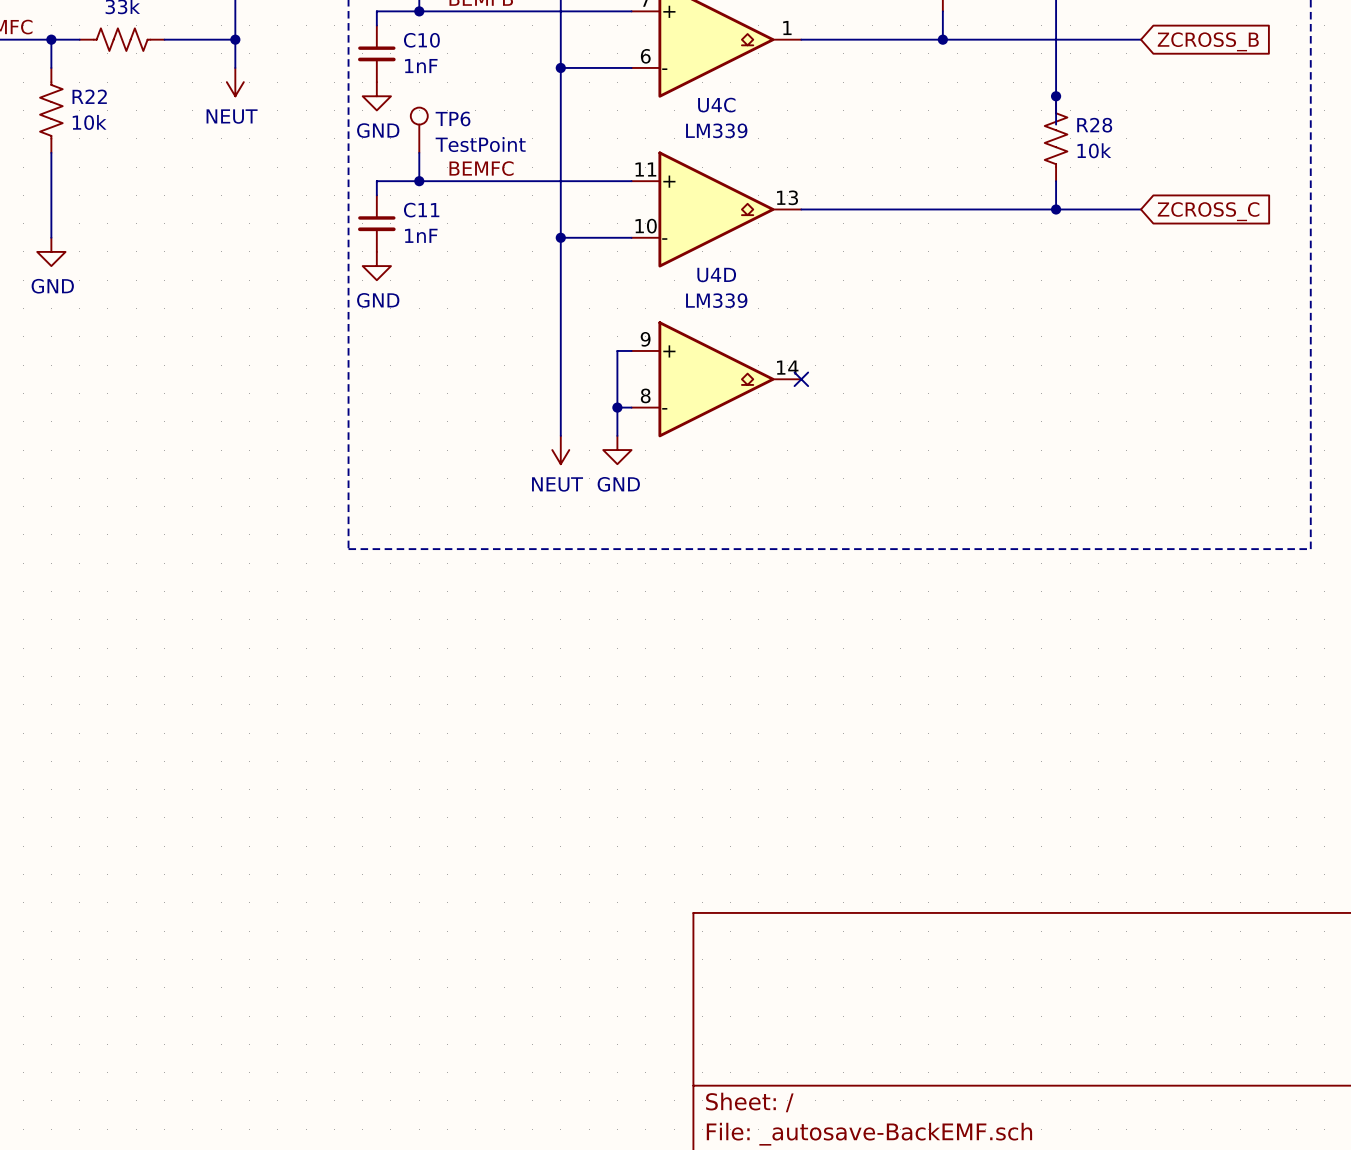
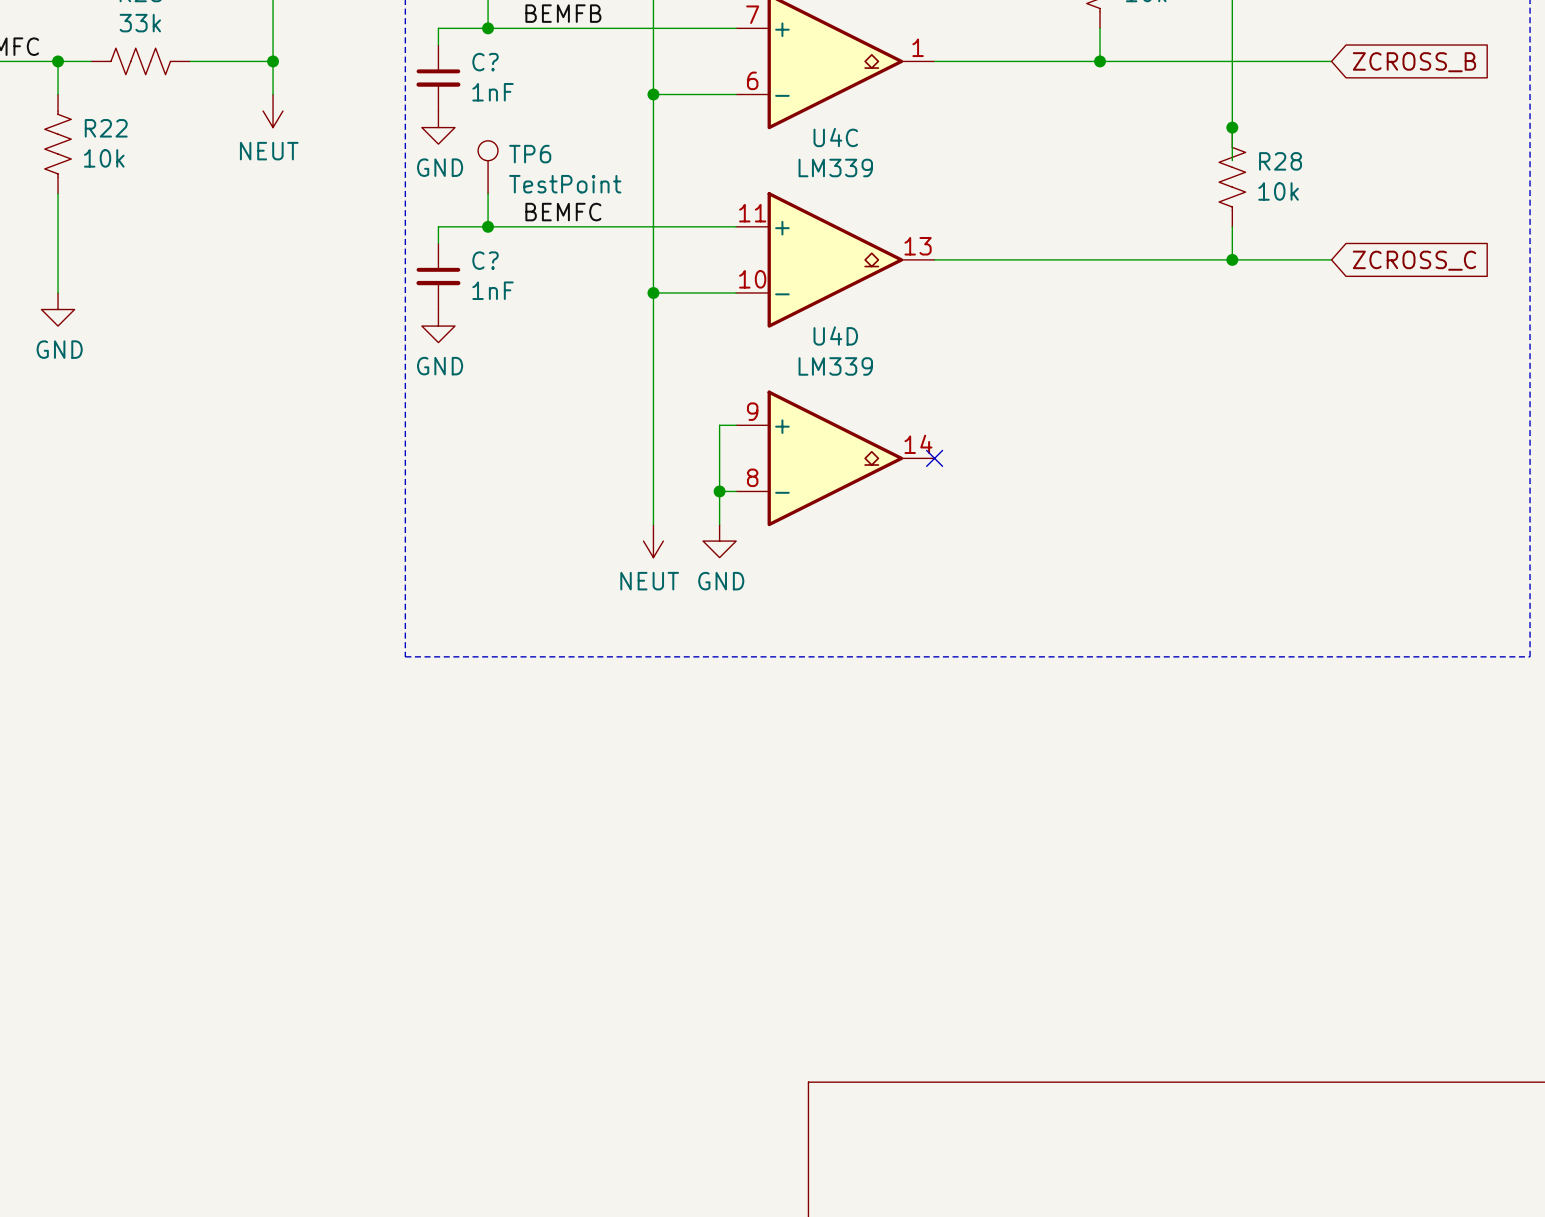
C10 name: C10 (421, 40) -> C? (485, 62)
C11 name: C11 (421, 210) -> C? (485, 260)

